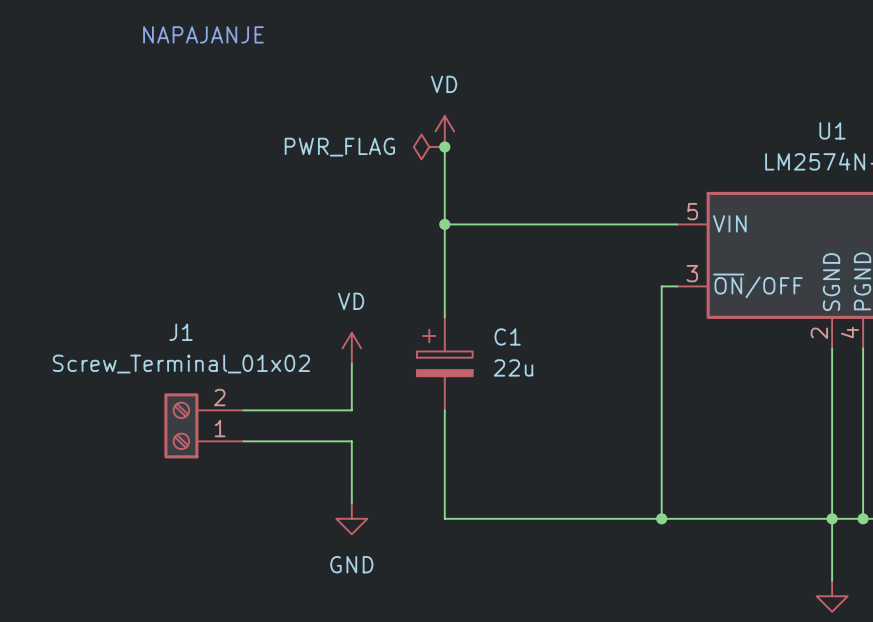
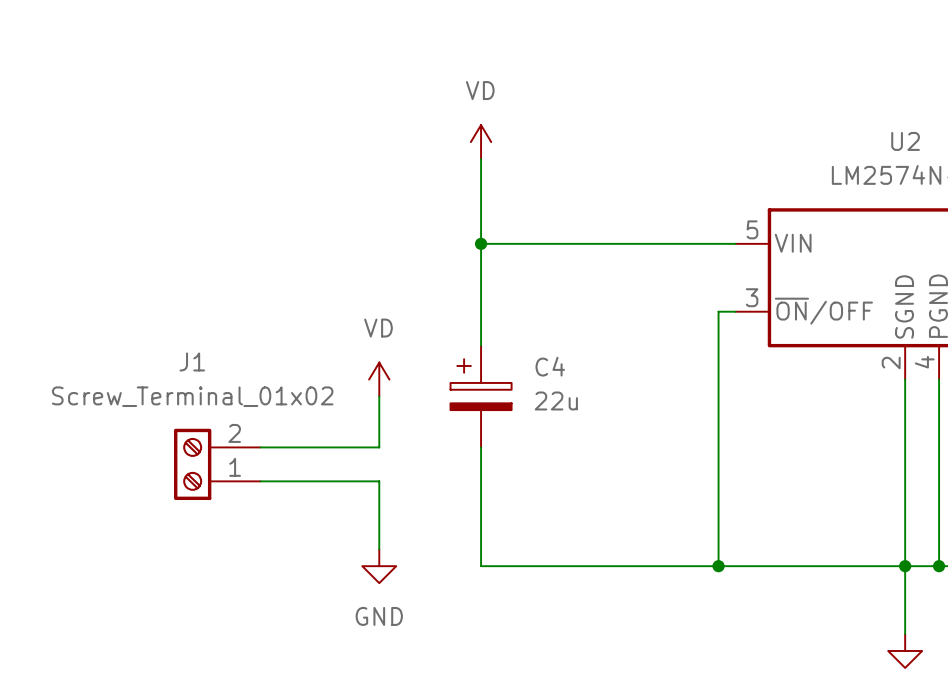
text: NAPAJANJE (203, 34) -> none
U1 name: U1 (832, 130) -> U2 (905, 141)
power symbol: PWR_FLAG (429, 146) -> none
junction: (444, 146) -> none
C1 name: C1 (507, 336) -> C4 (550, 366)

